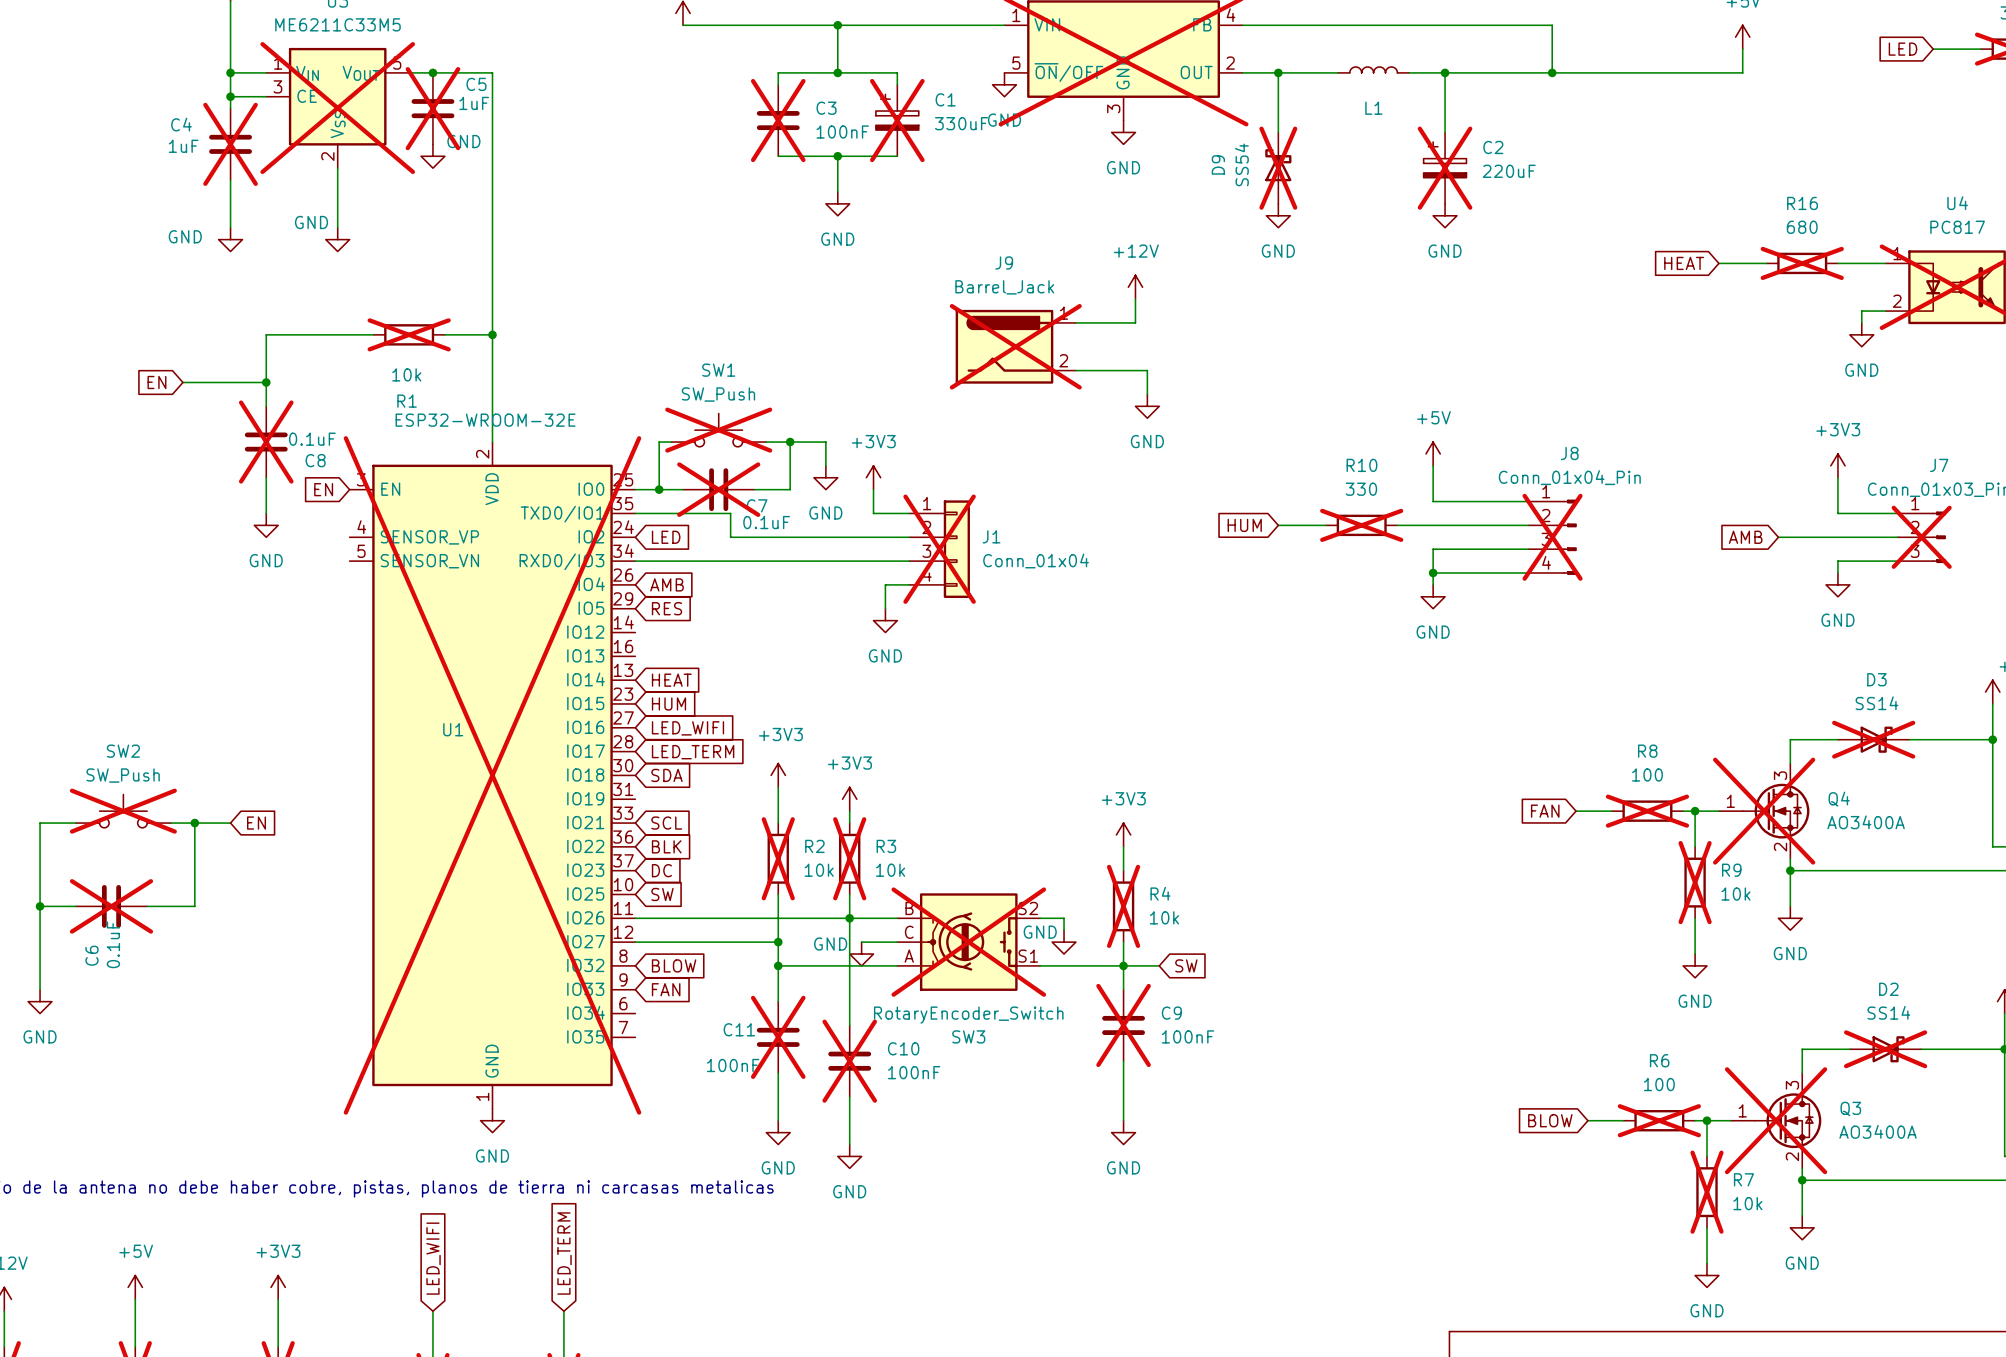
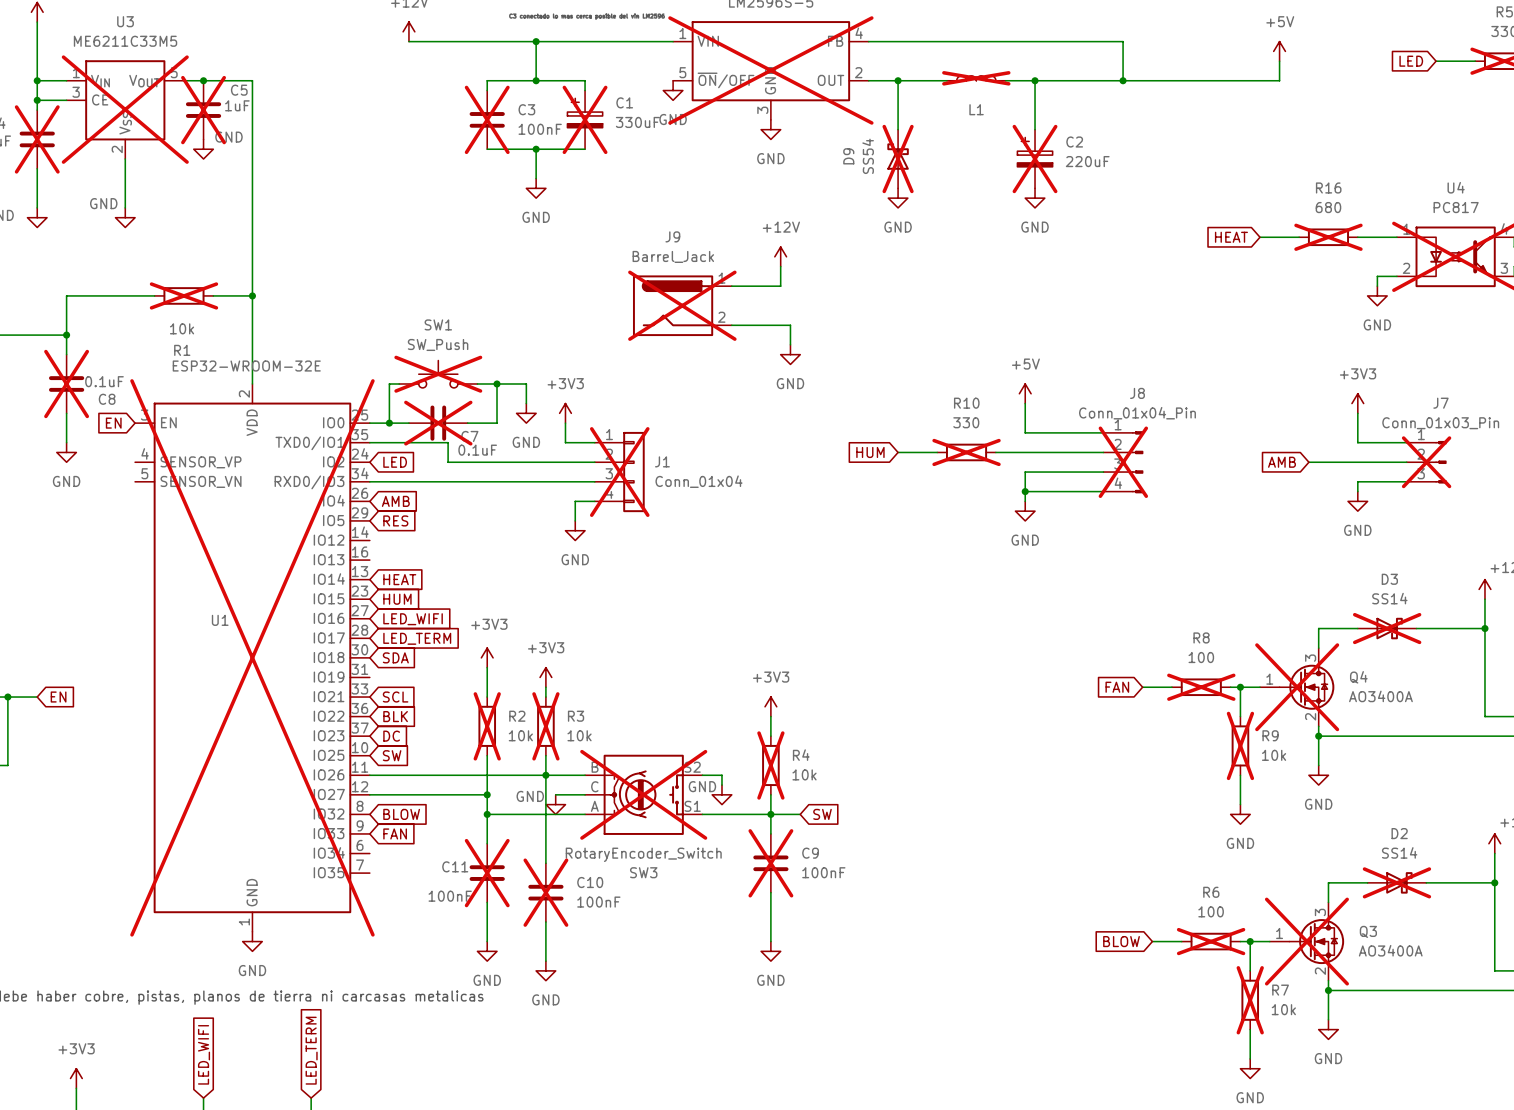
L1 do-not-place cross: none -> (976, 78)

